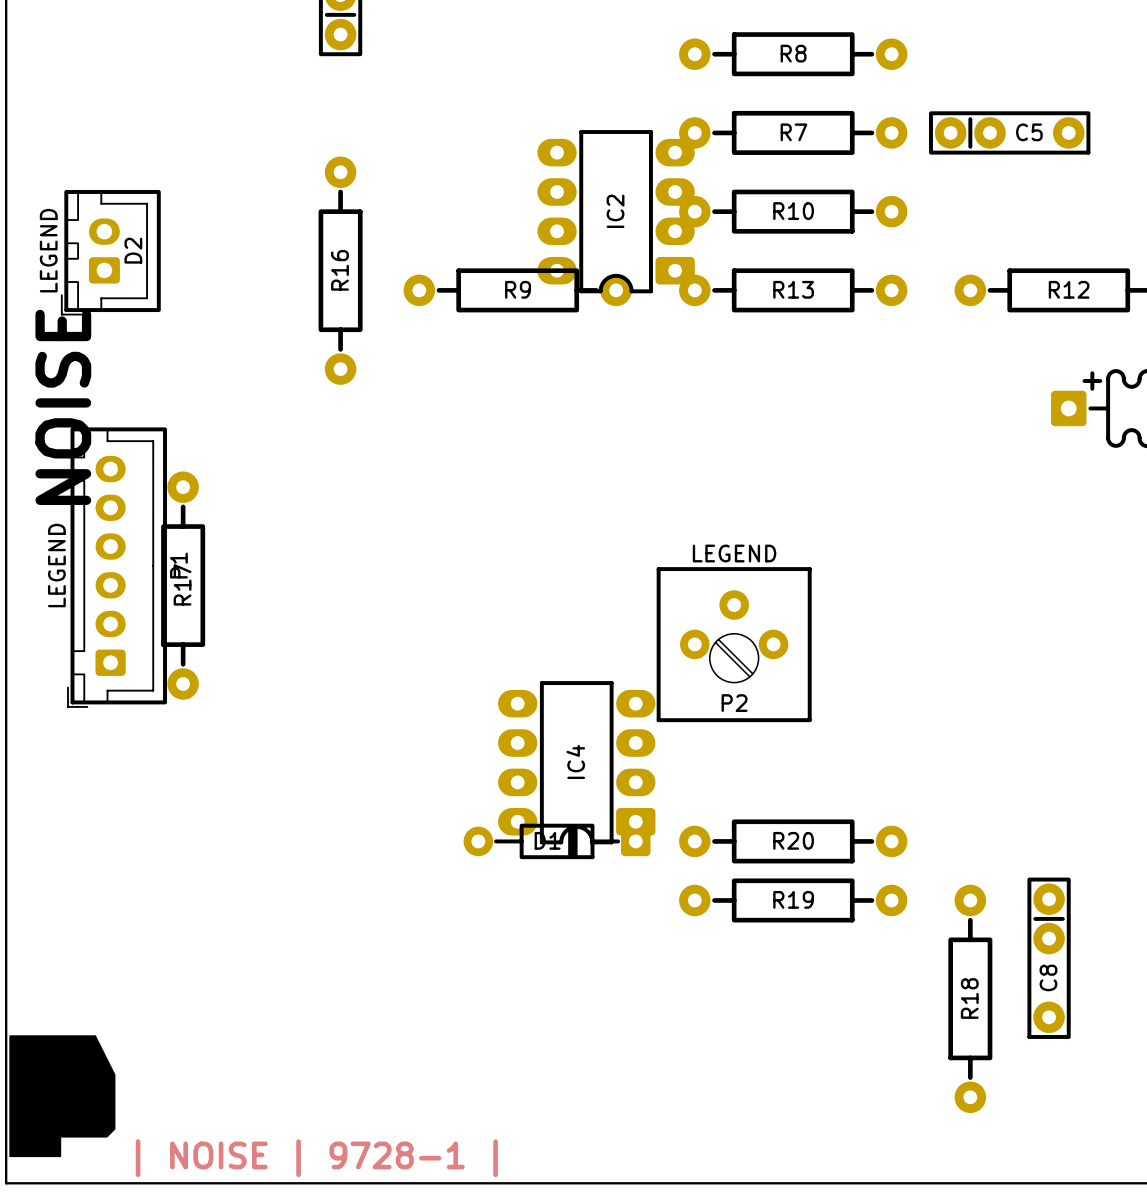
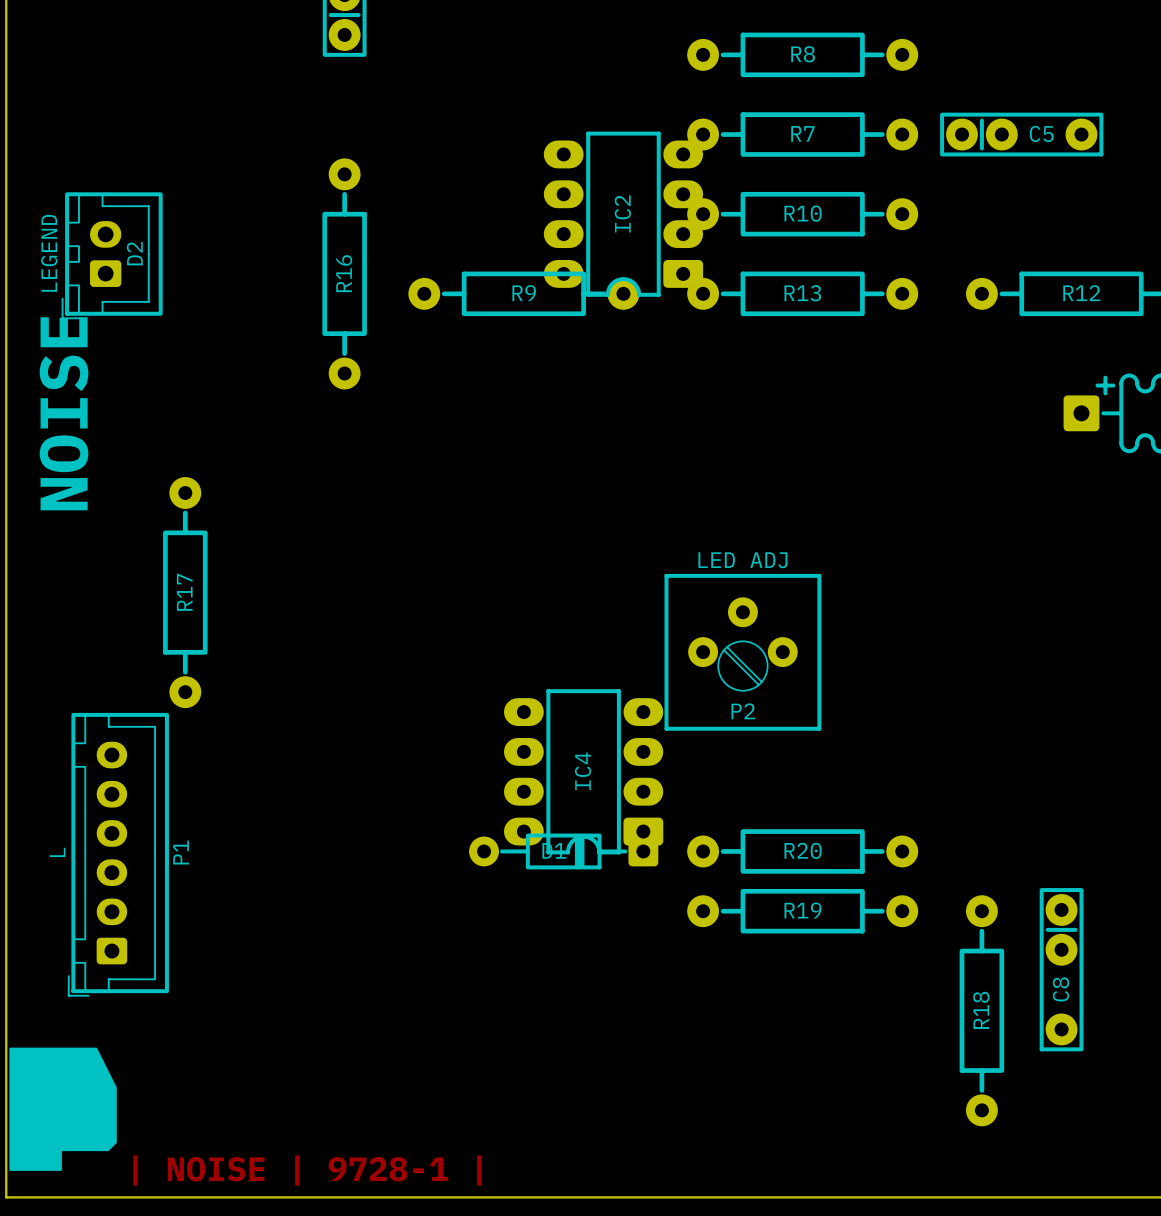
P2 text: LEGEND (734, 553) -> LED ADJ (742, 560)
P1 text: LEGEND (56, 565) -> L (57, 852)
P1 position: (117, 567) -> (118, 854)

